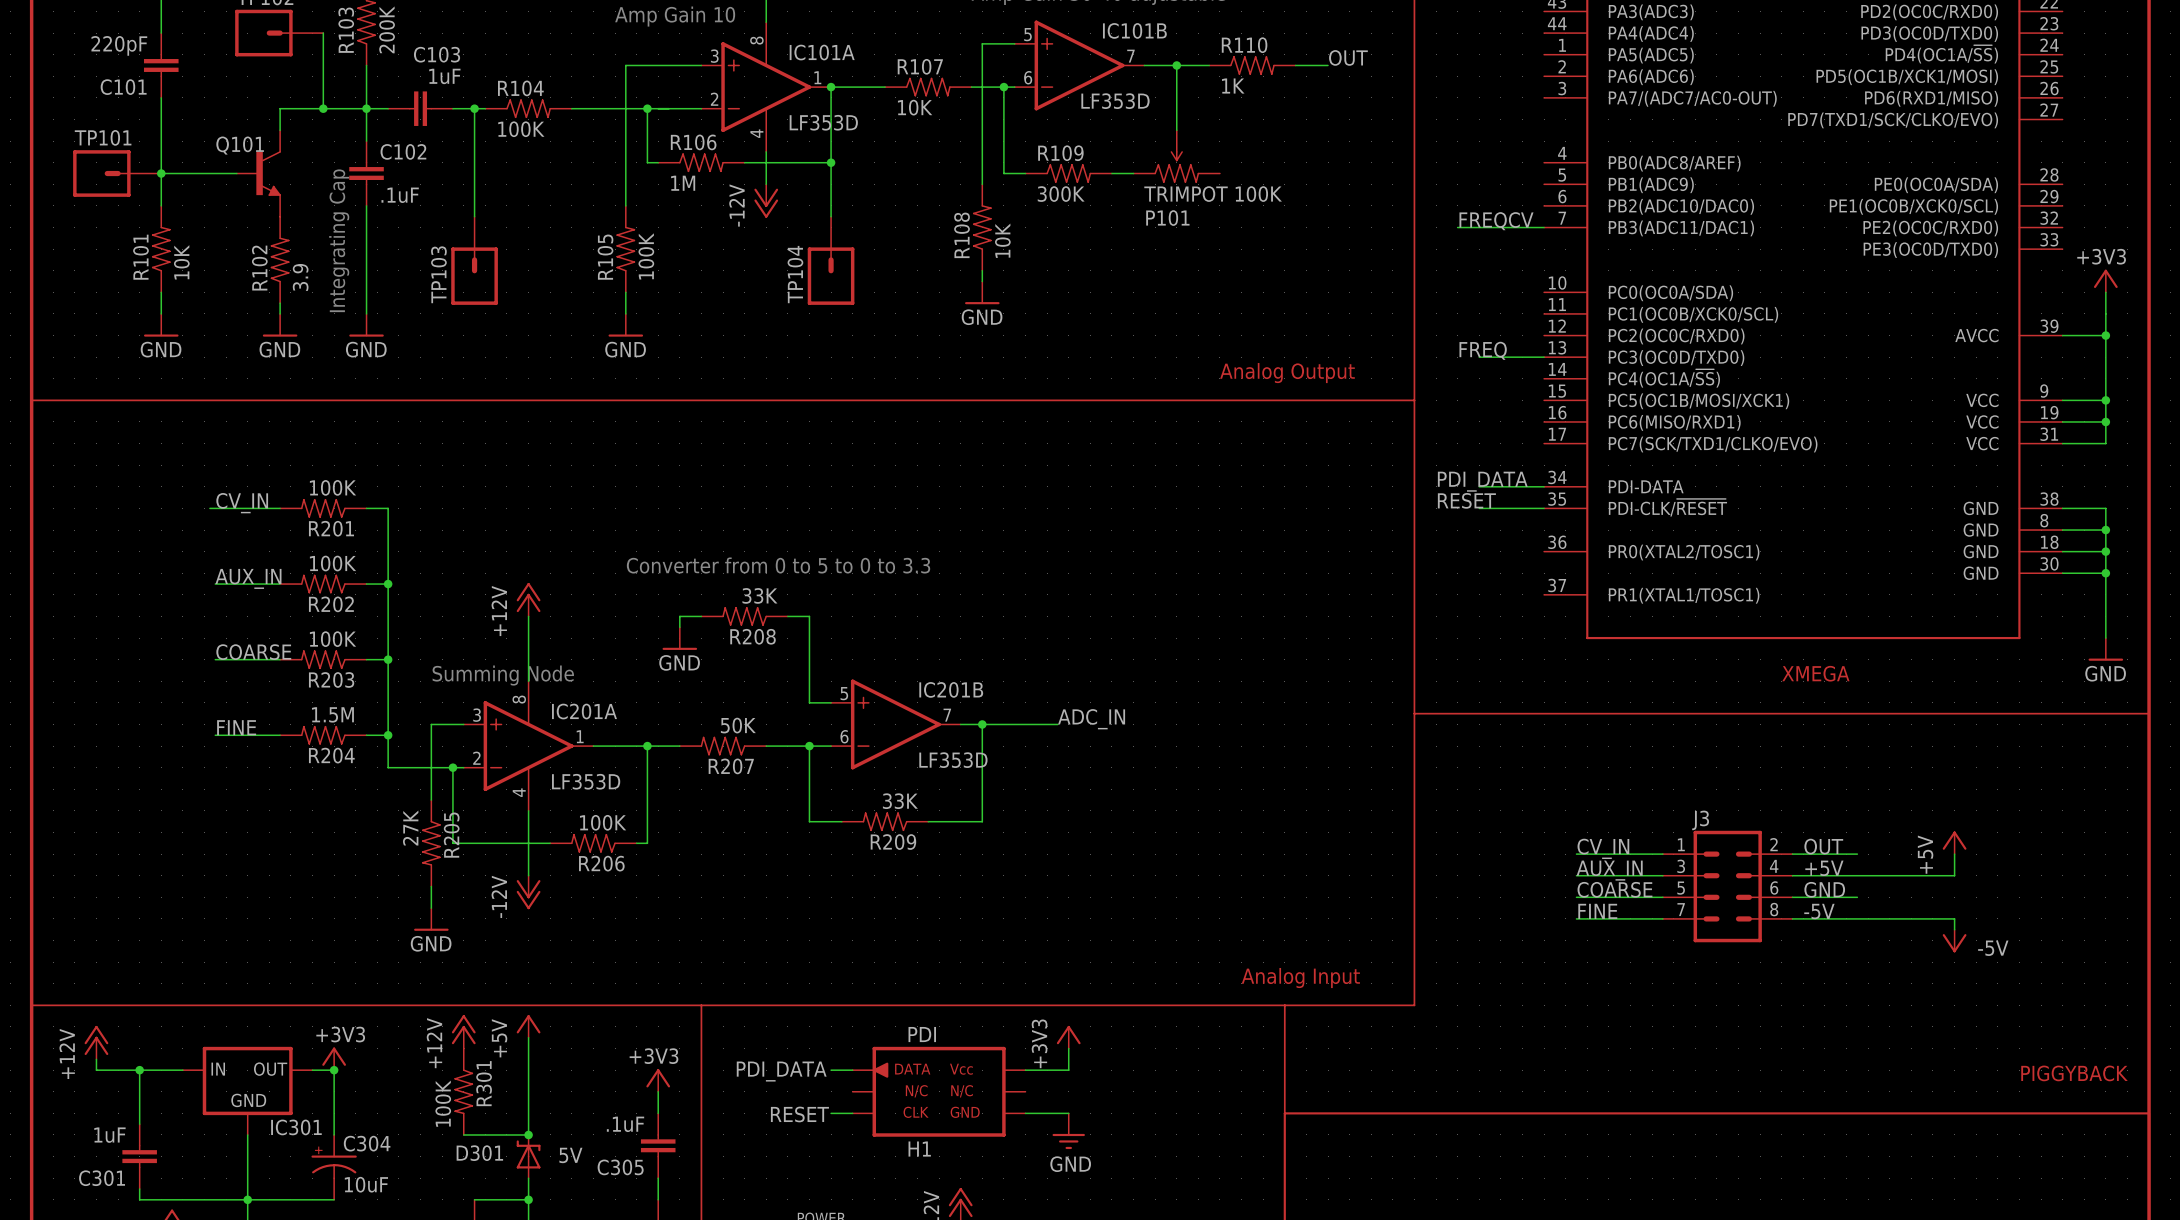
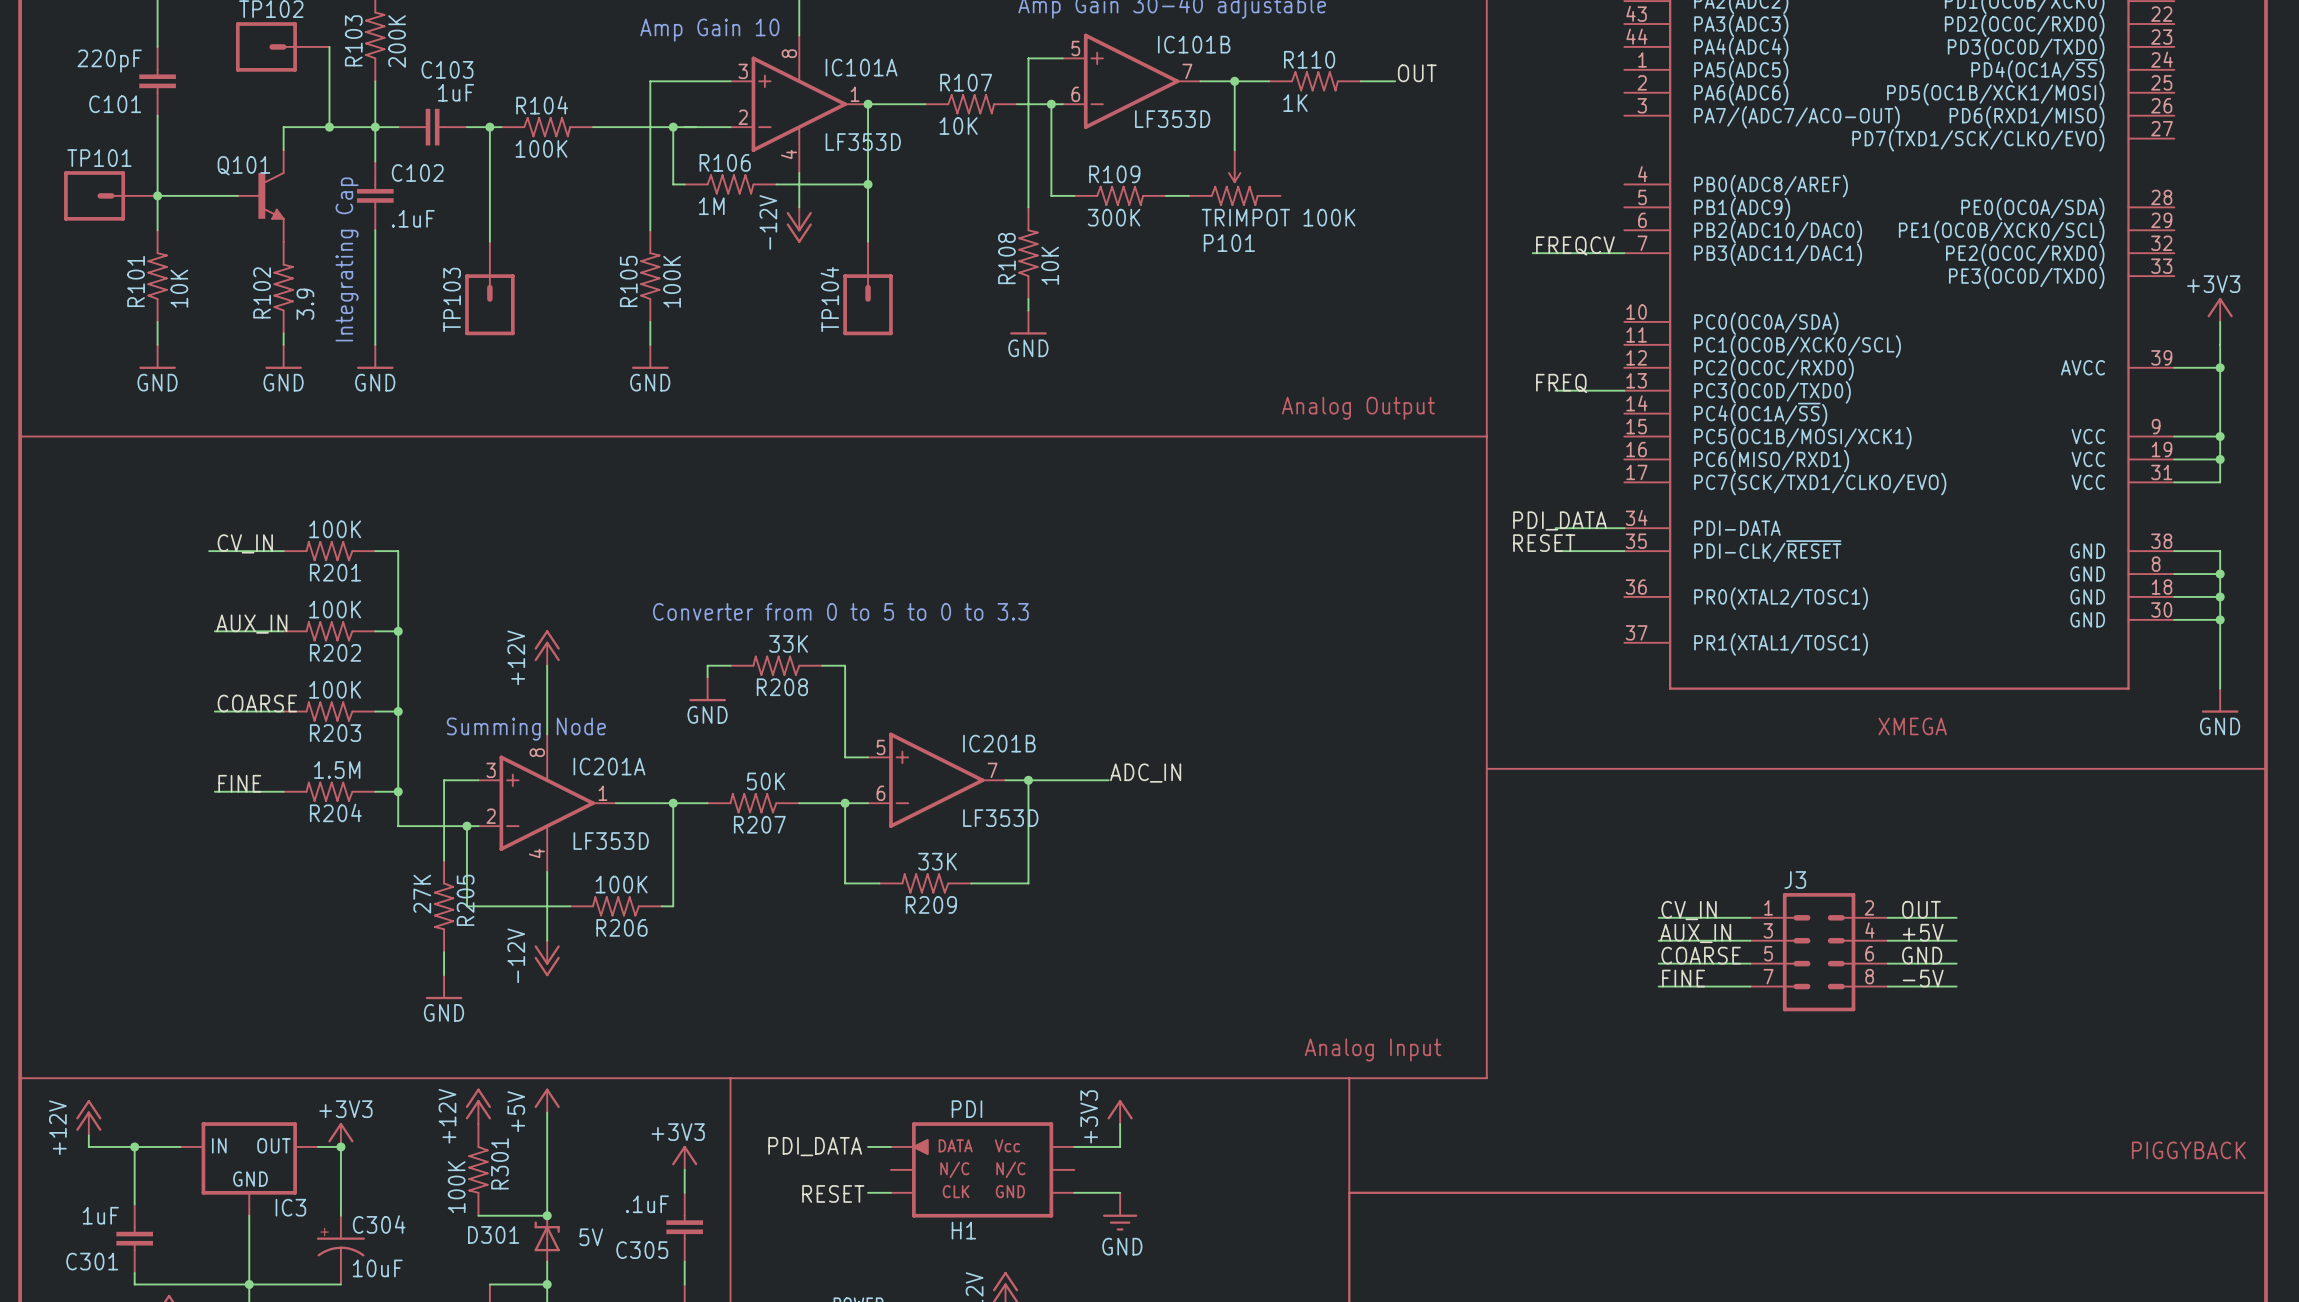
power symbol: +5V (1954, 842) -> none
wire: (1954, 854) (1954, 875) (1857, 875) -> none
wire: (1857, 918) (1954, 918) (1954, 929) -> none
power symbol: -5V (1954, 941) -> none
IC301 name: IC301 (296, 1127) -> IC3 (290, 1207)

